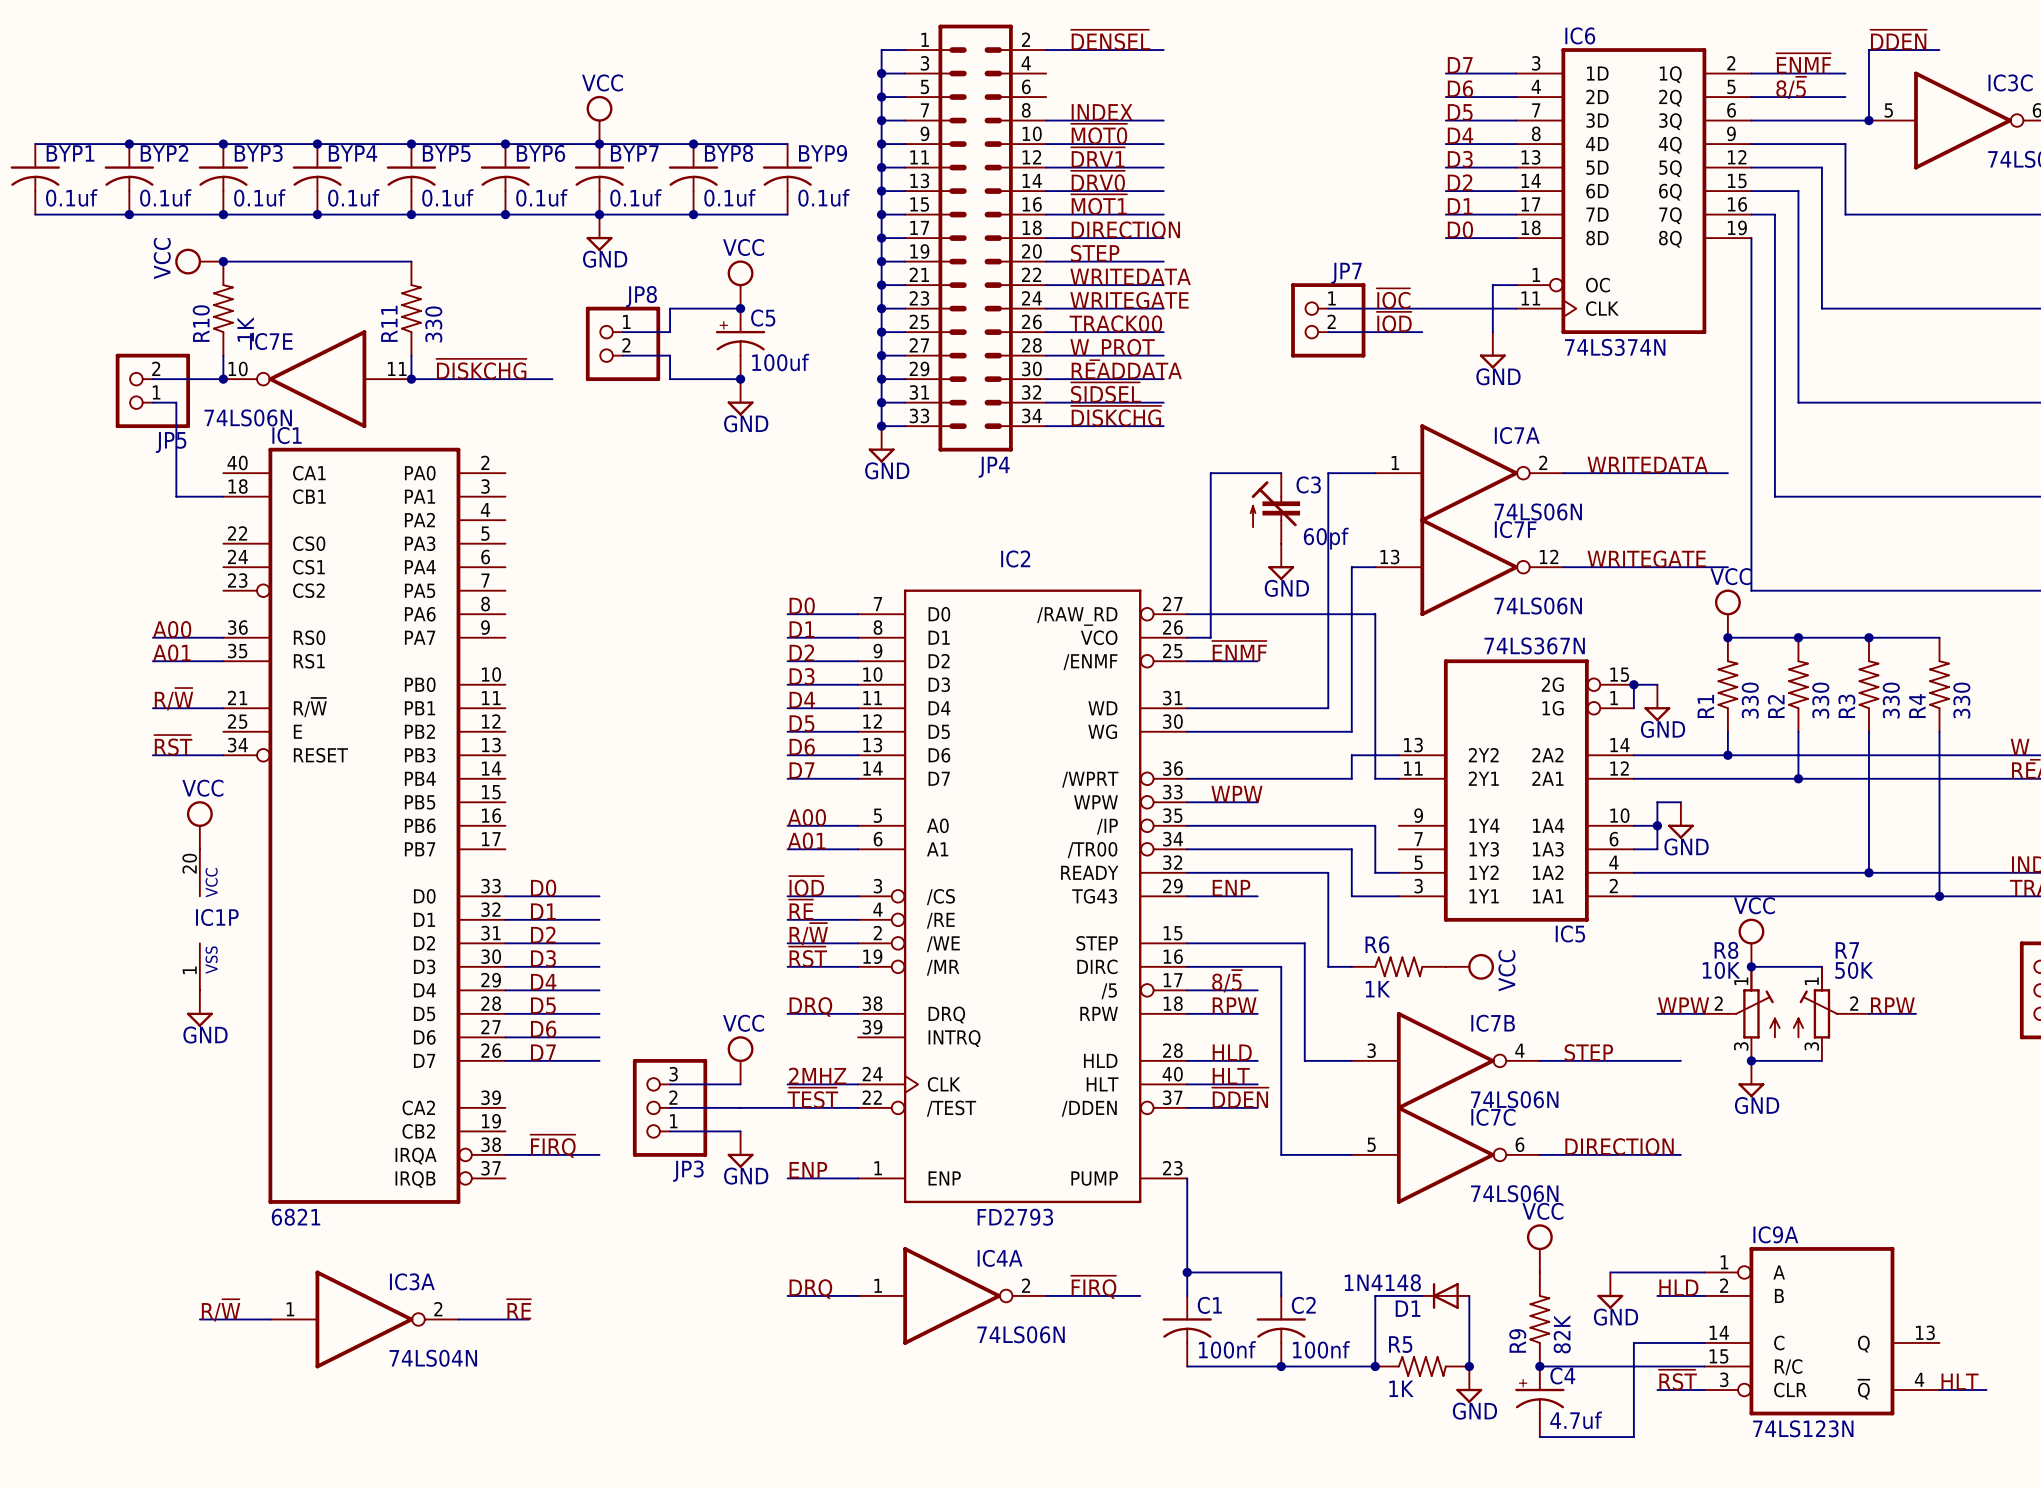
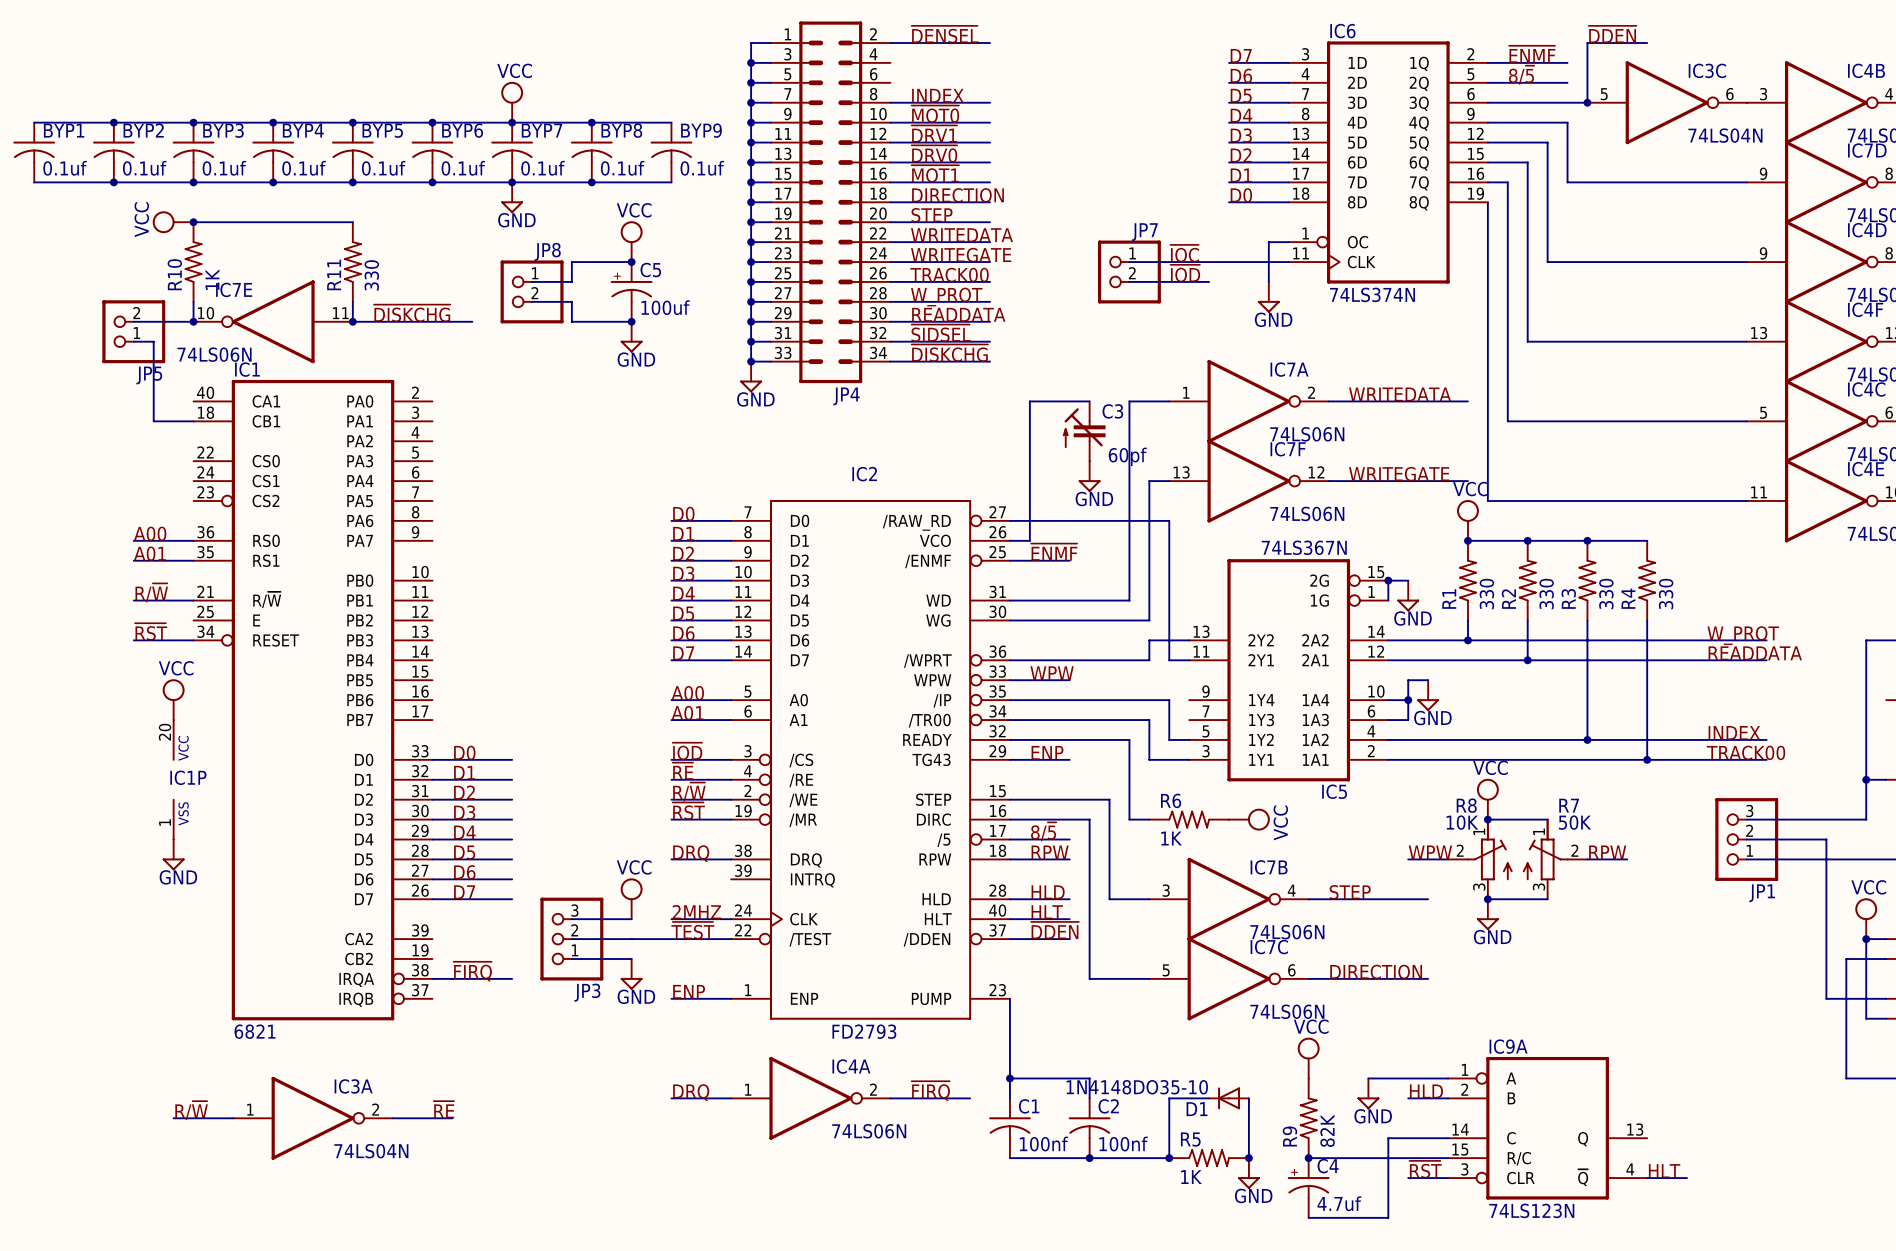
D1 value: 1N4148 (1382, 1282) -> 1N4148DO35-10 (1137, 1087)

